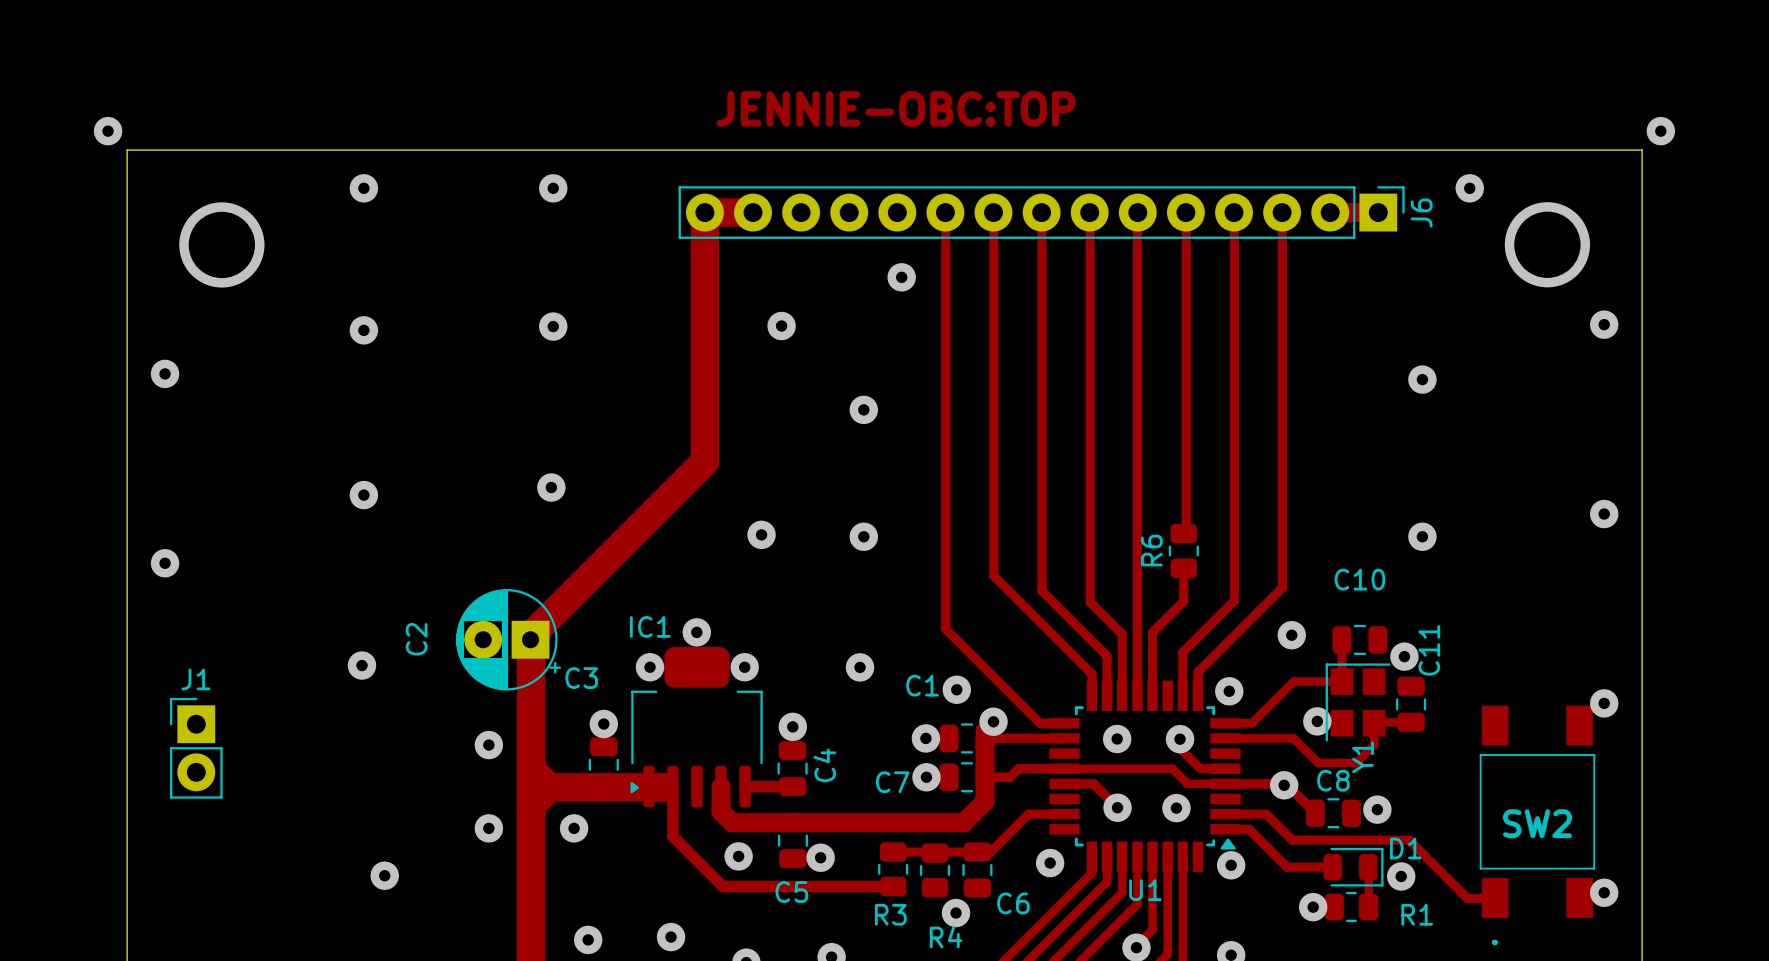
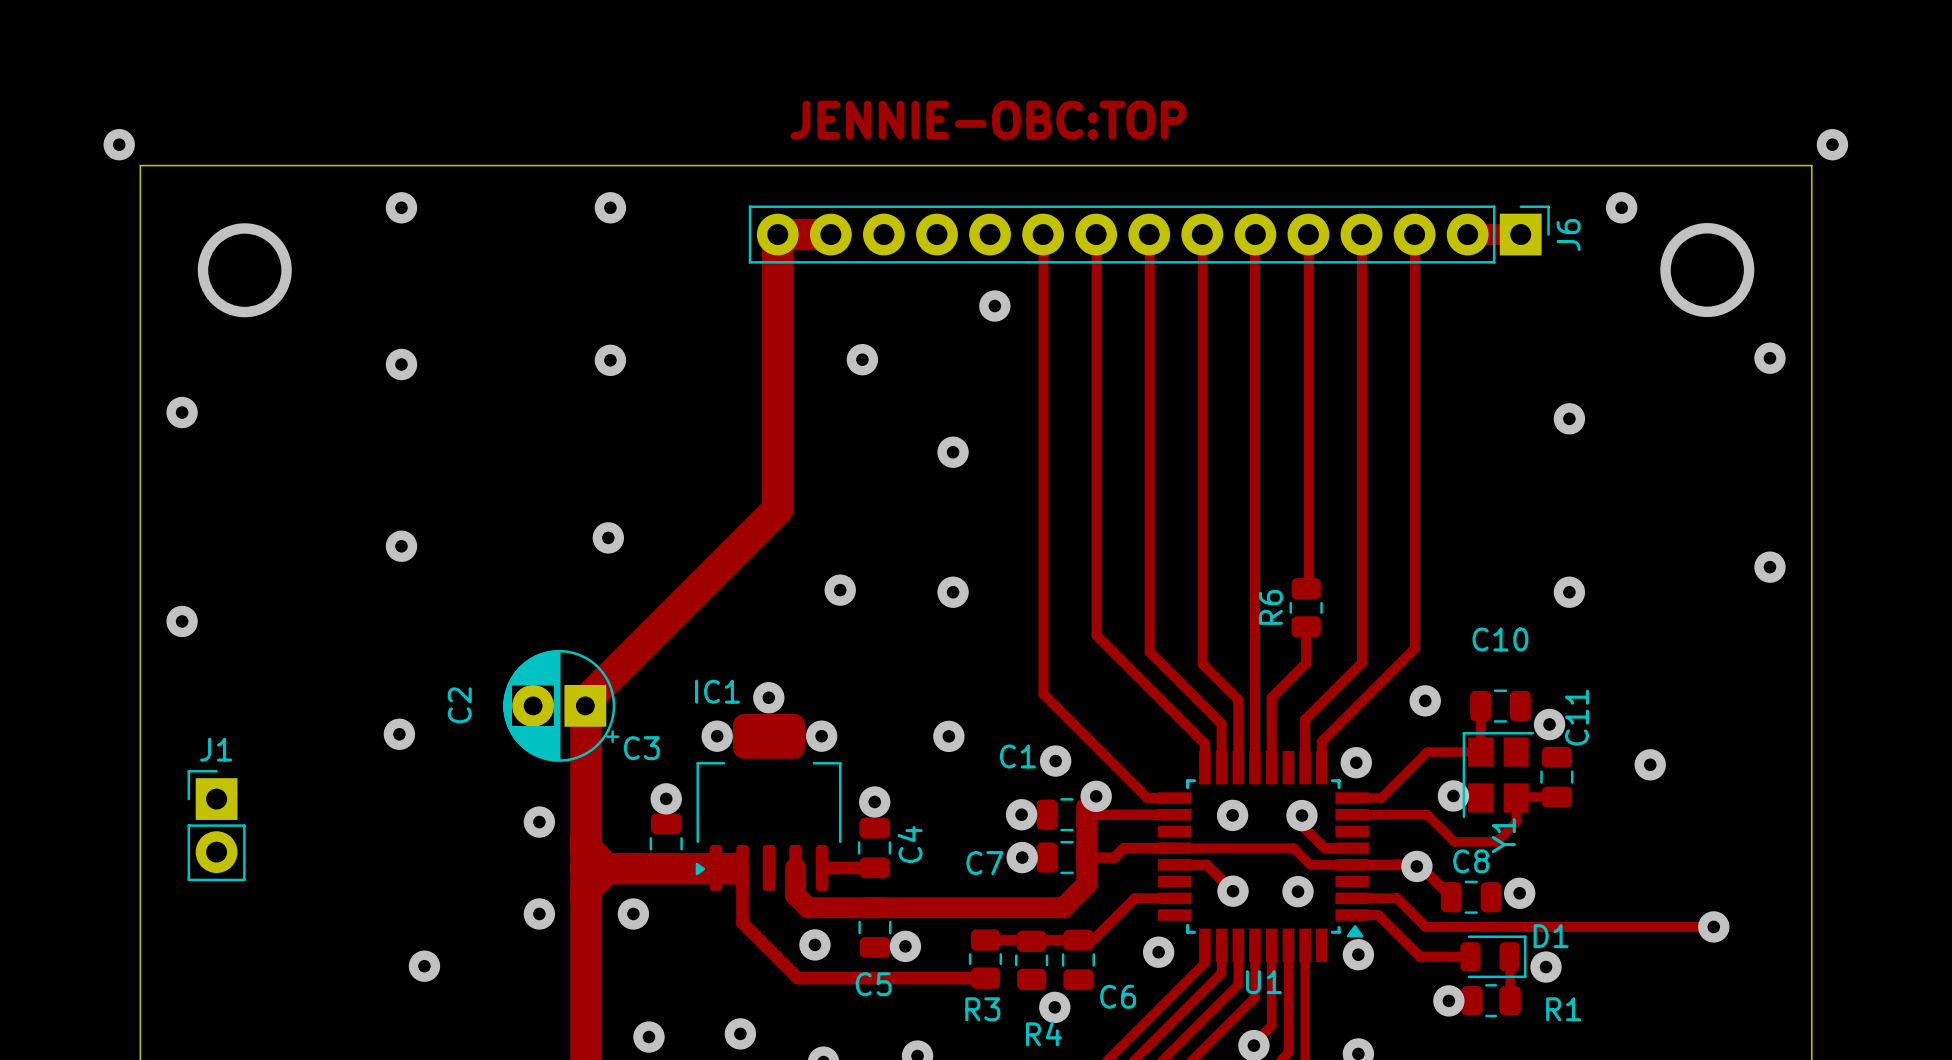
via: none -> (1650, 764)
via: (1604, 703) -> none
SW2: (1537, 825) -> none
track: (1409, 840) (1467, 898) (1495, 897) -> (1554, 926) (1714, 926)
via: none -> (1713, 926)
via: (1604, 892) -> none

